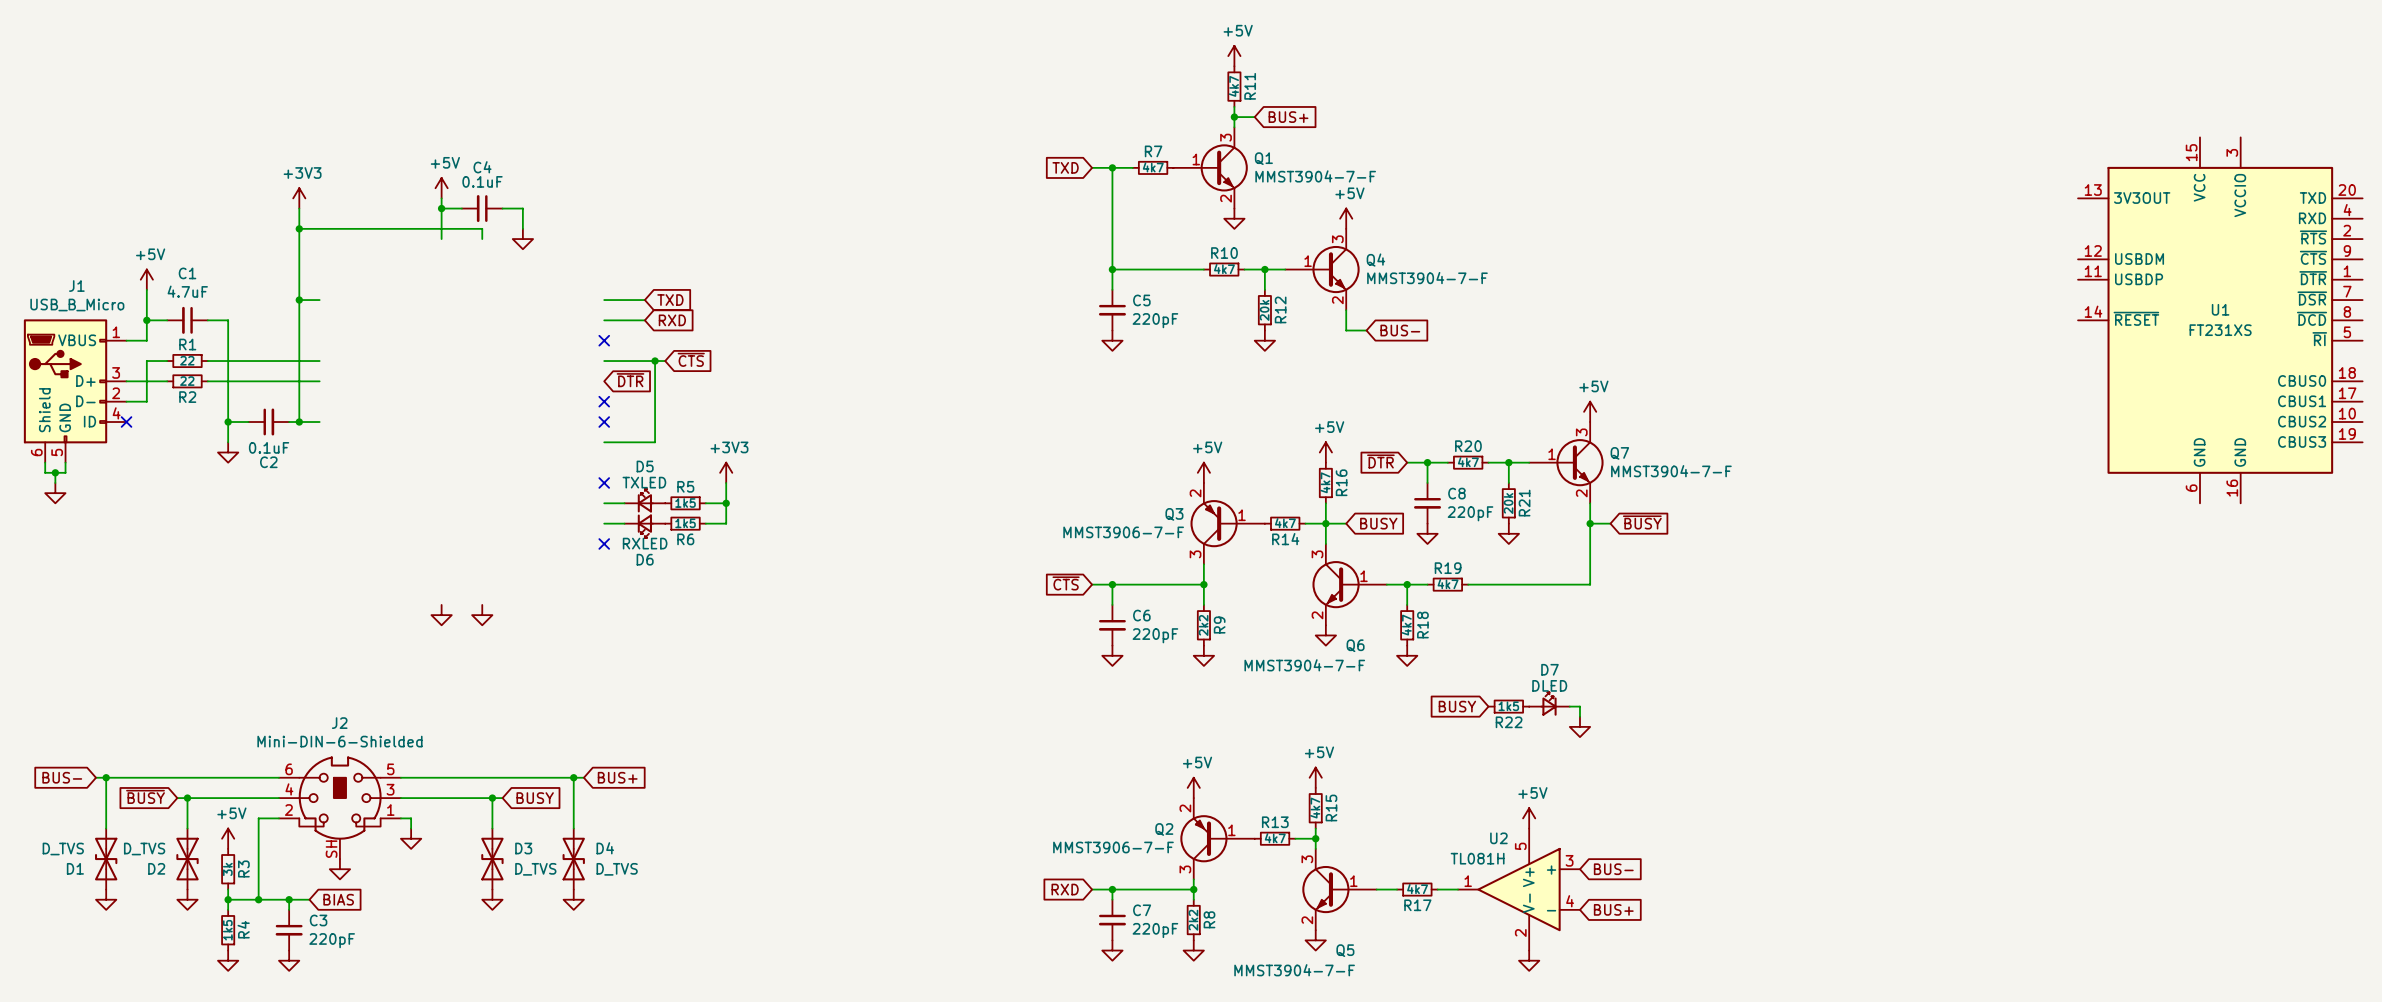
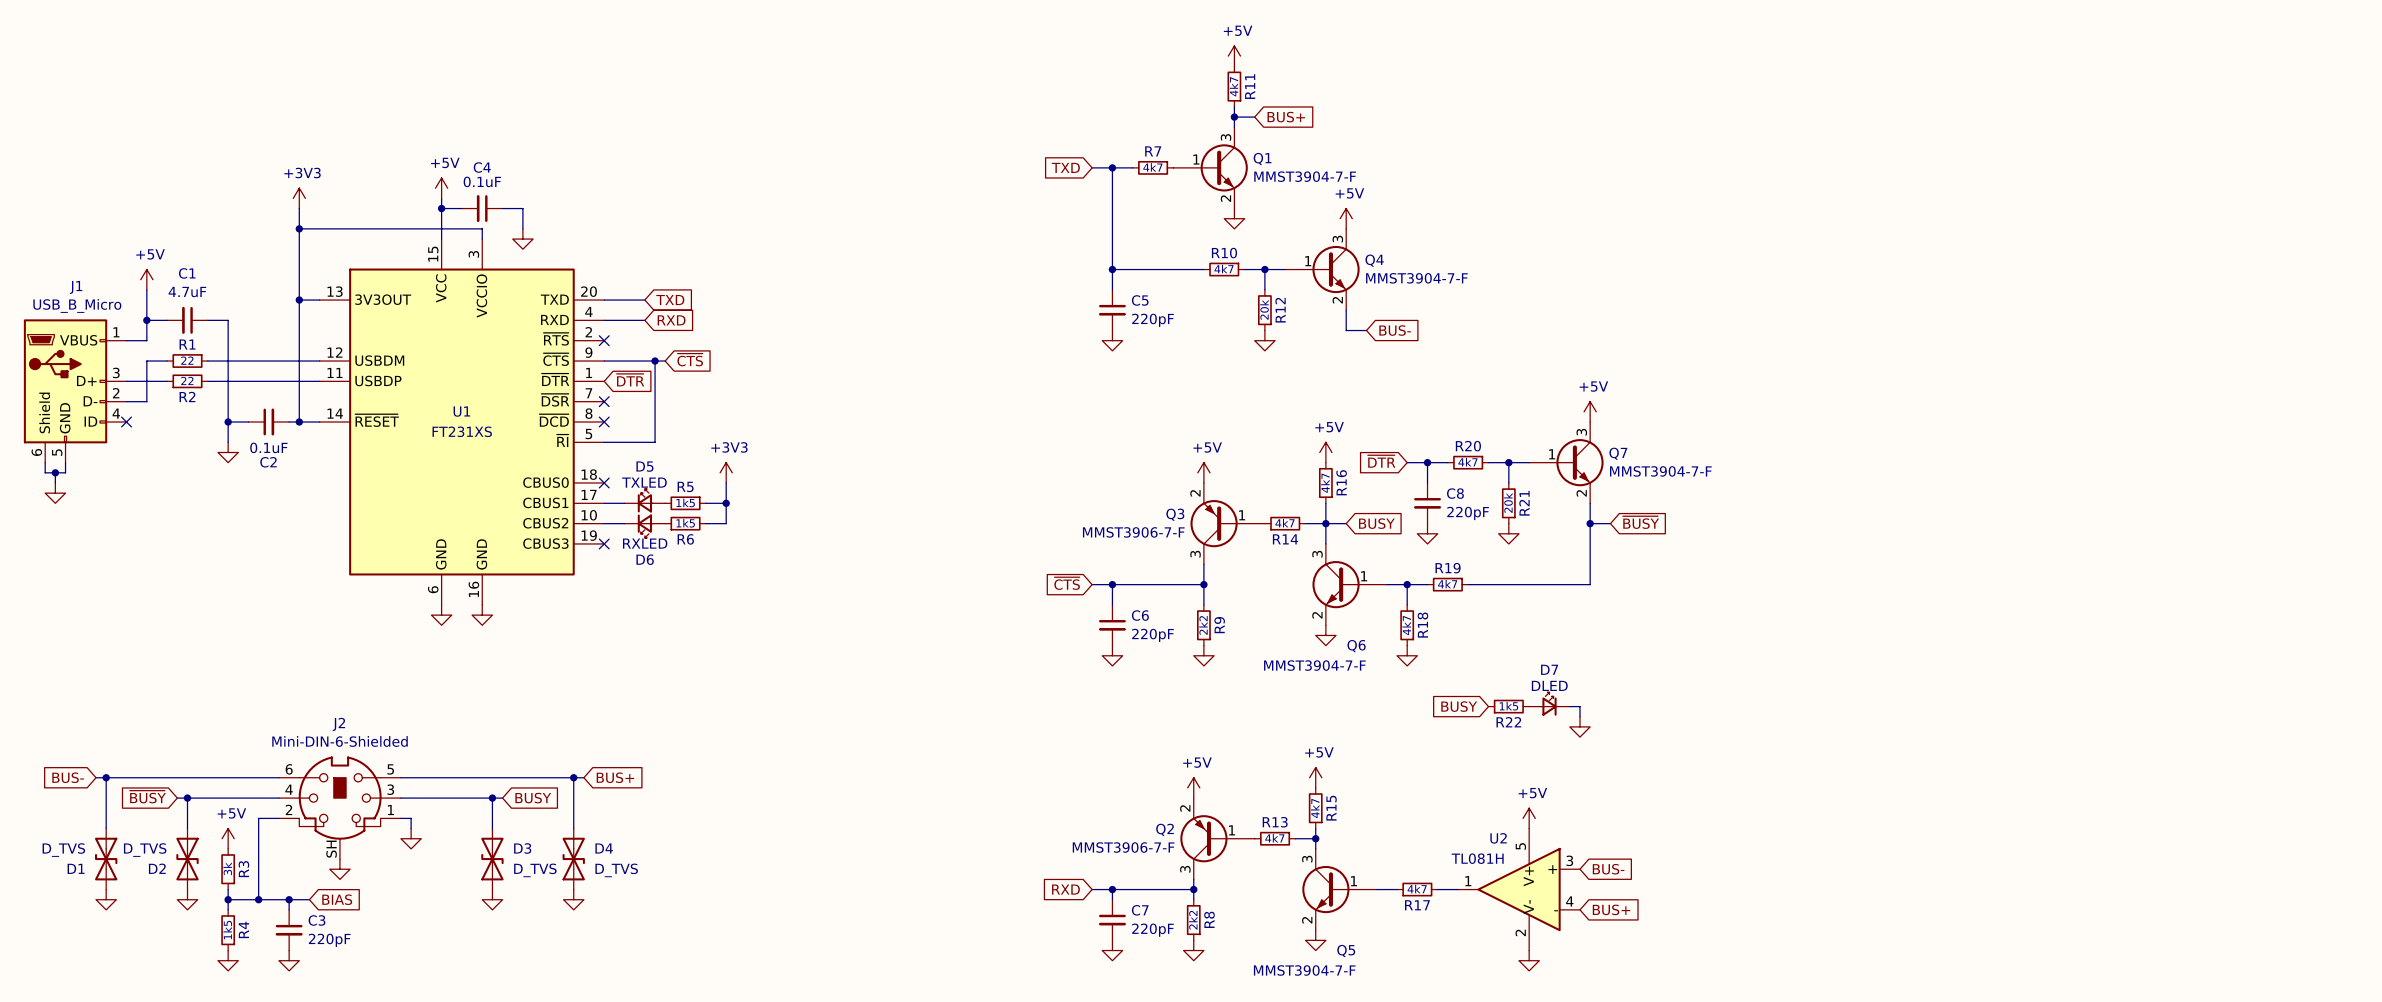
U1 position: (2220, 320) -> (461, 422)

